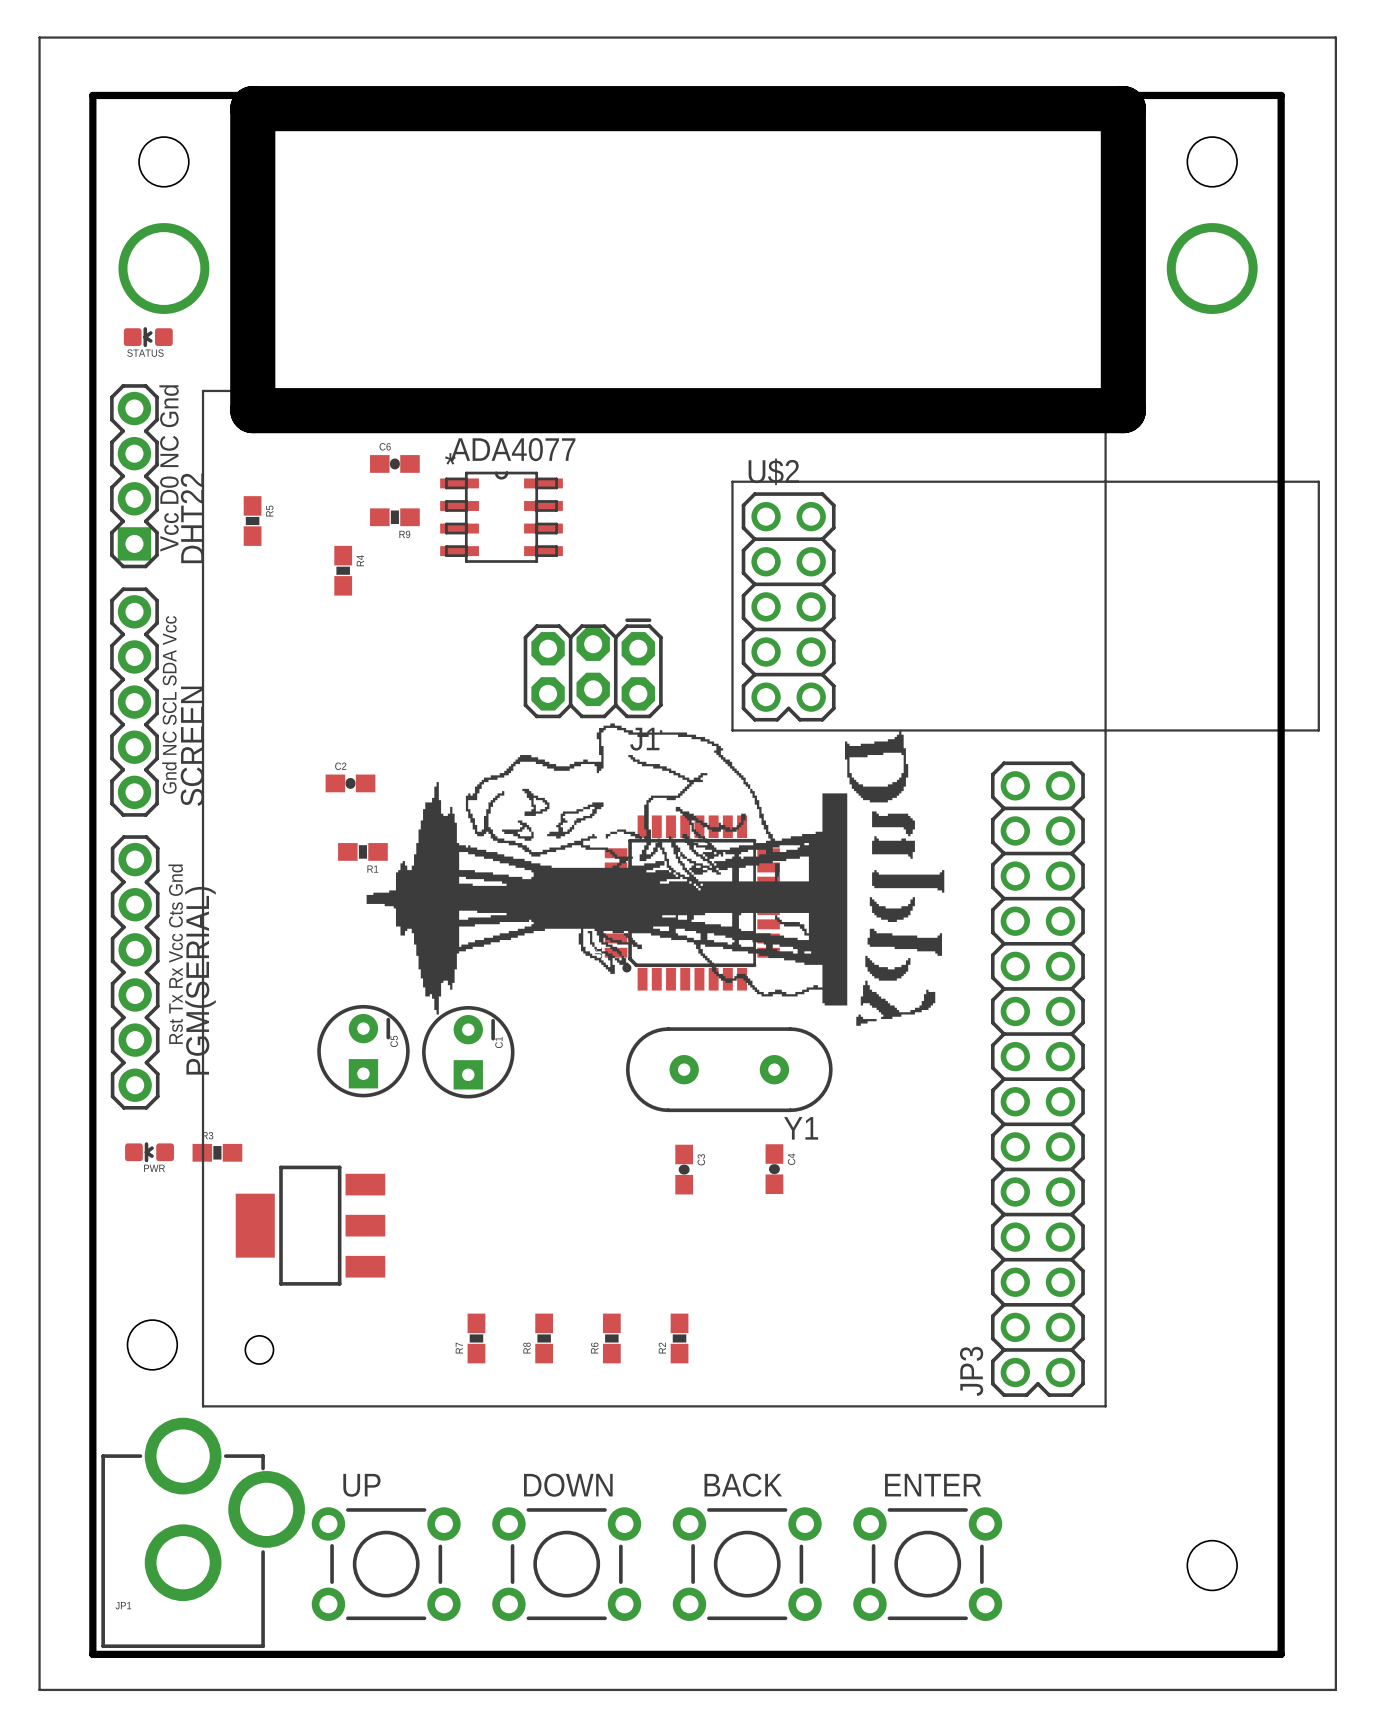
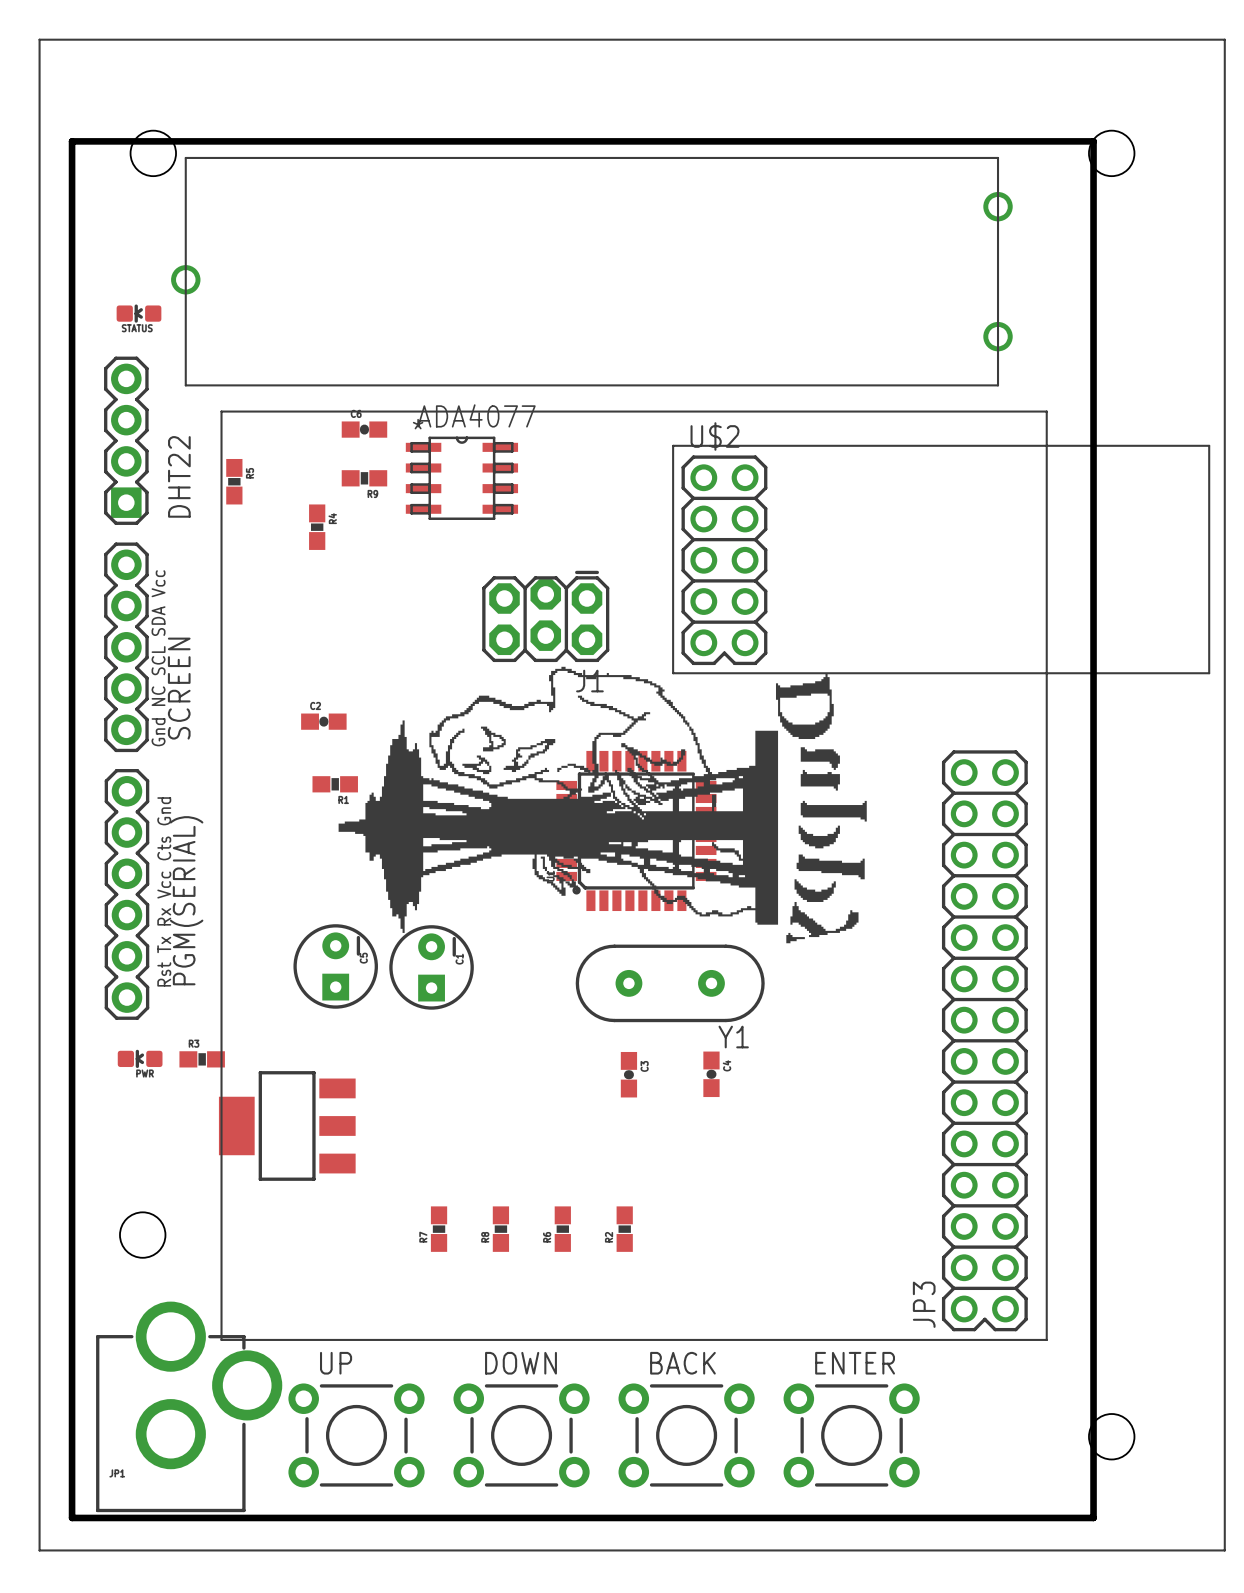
part: (688, 259) -> none
part: none -> (591, 271)
JP3 footprint: [201, 389, 1107, 1408] -> [220, 410, 1048, 1341]
text: Vcc D0 NC Gnd (169, 468) -> none
board edge: (92, 1654) (92, 95) (1281, 95) (1281, 1654) (1192, 1654) -> (88, 1517) (72, 1517) (72, 141) (1093, 141) (1093, 1517)

